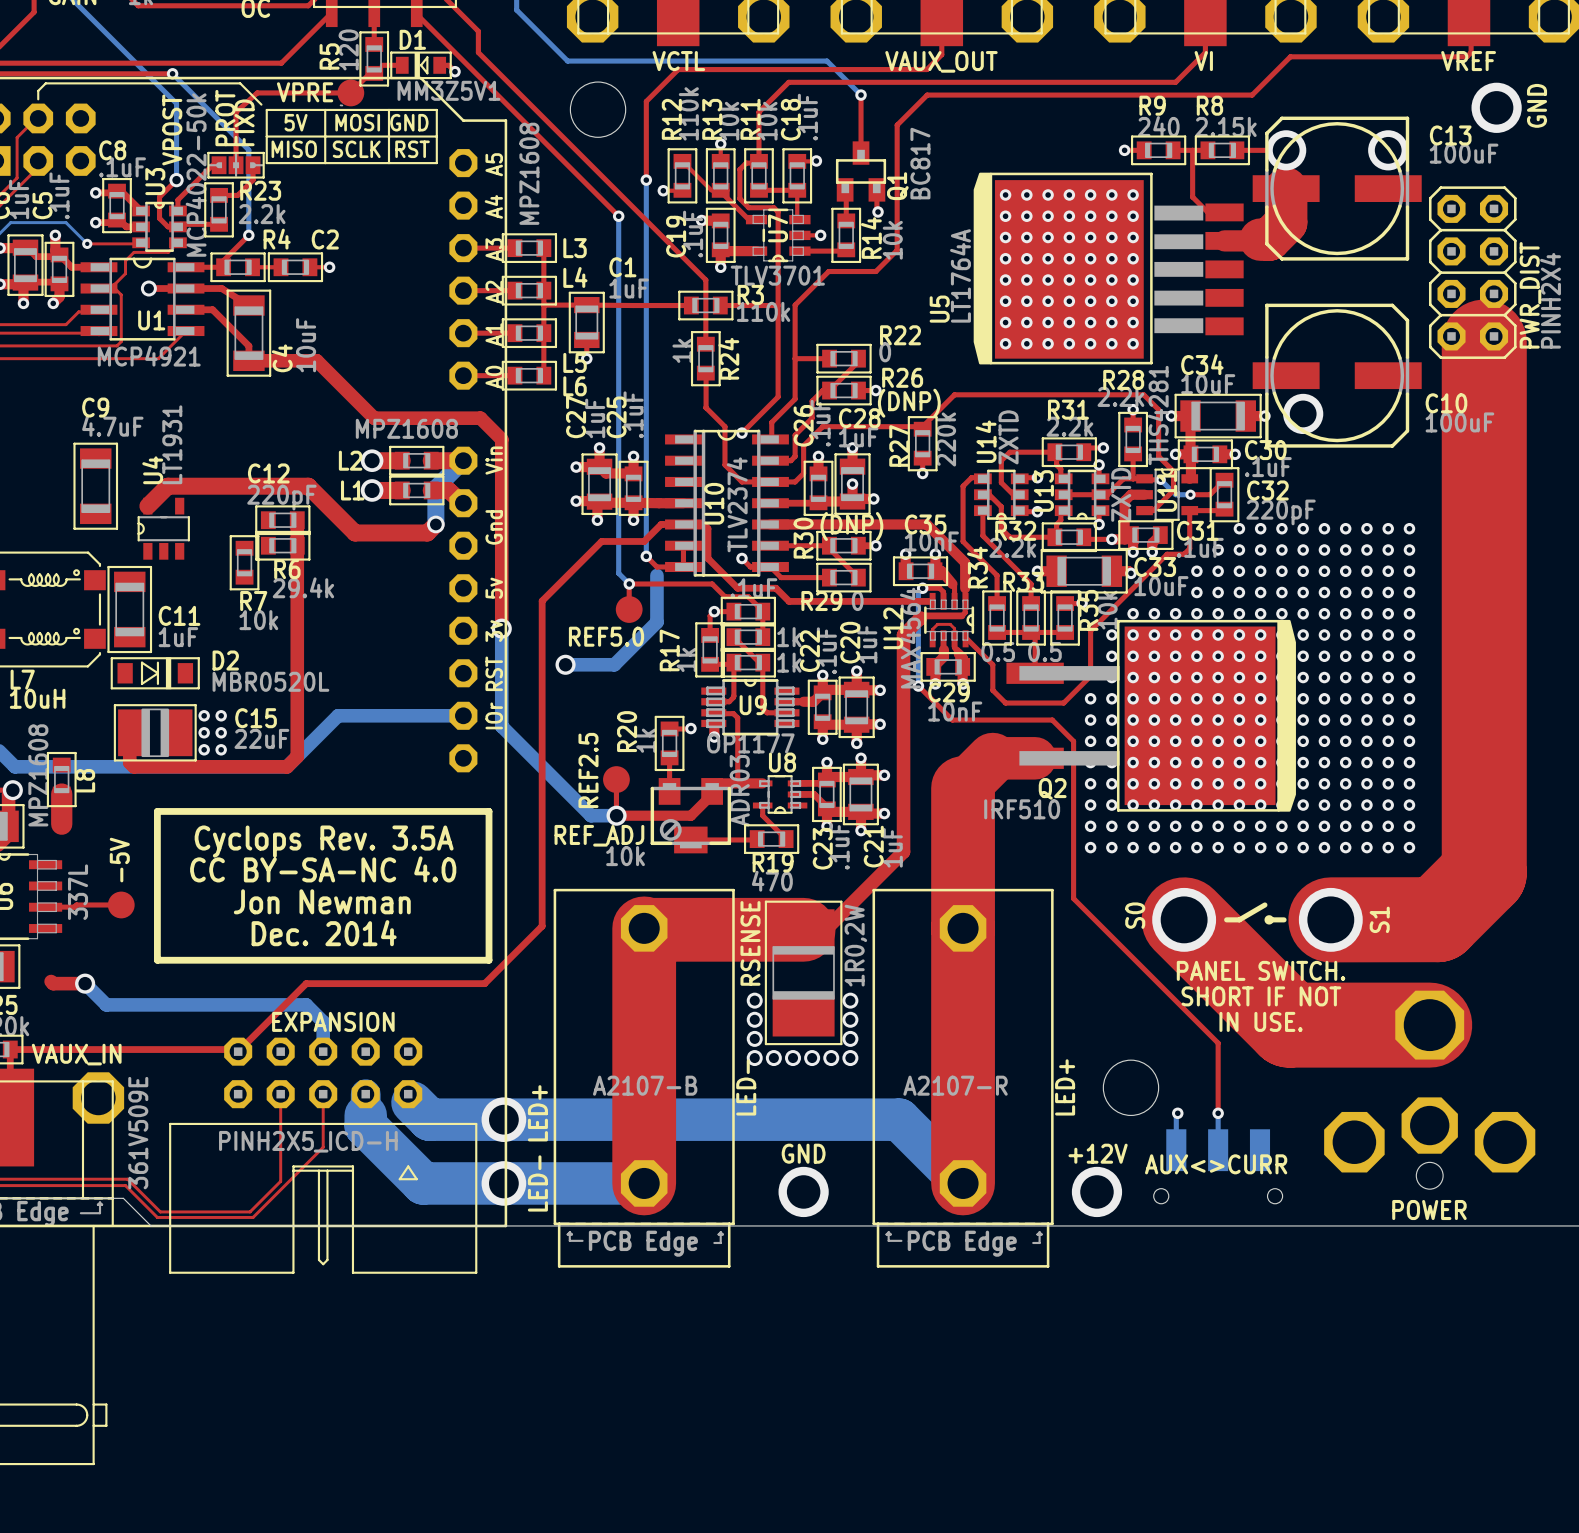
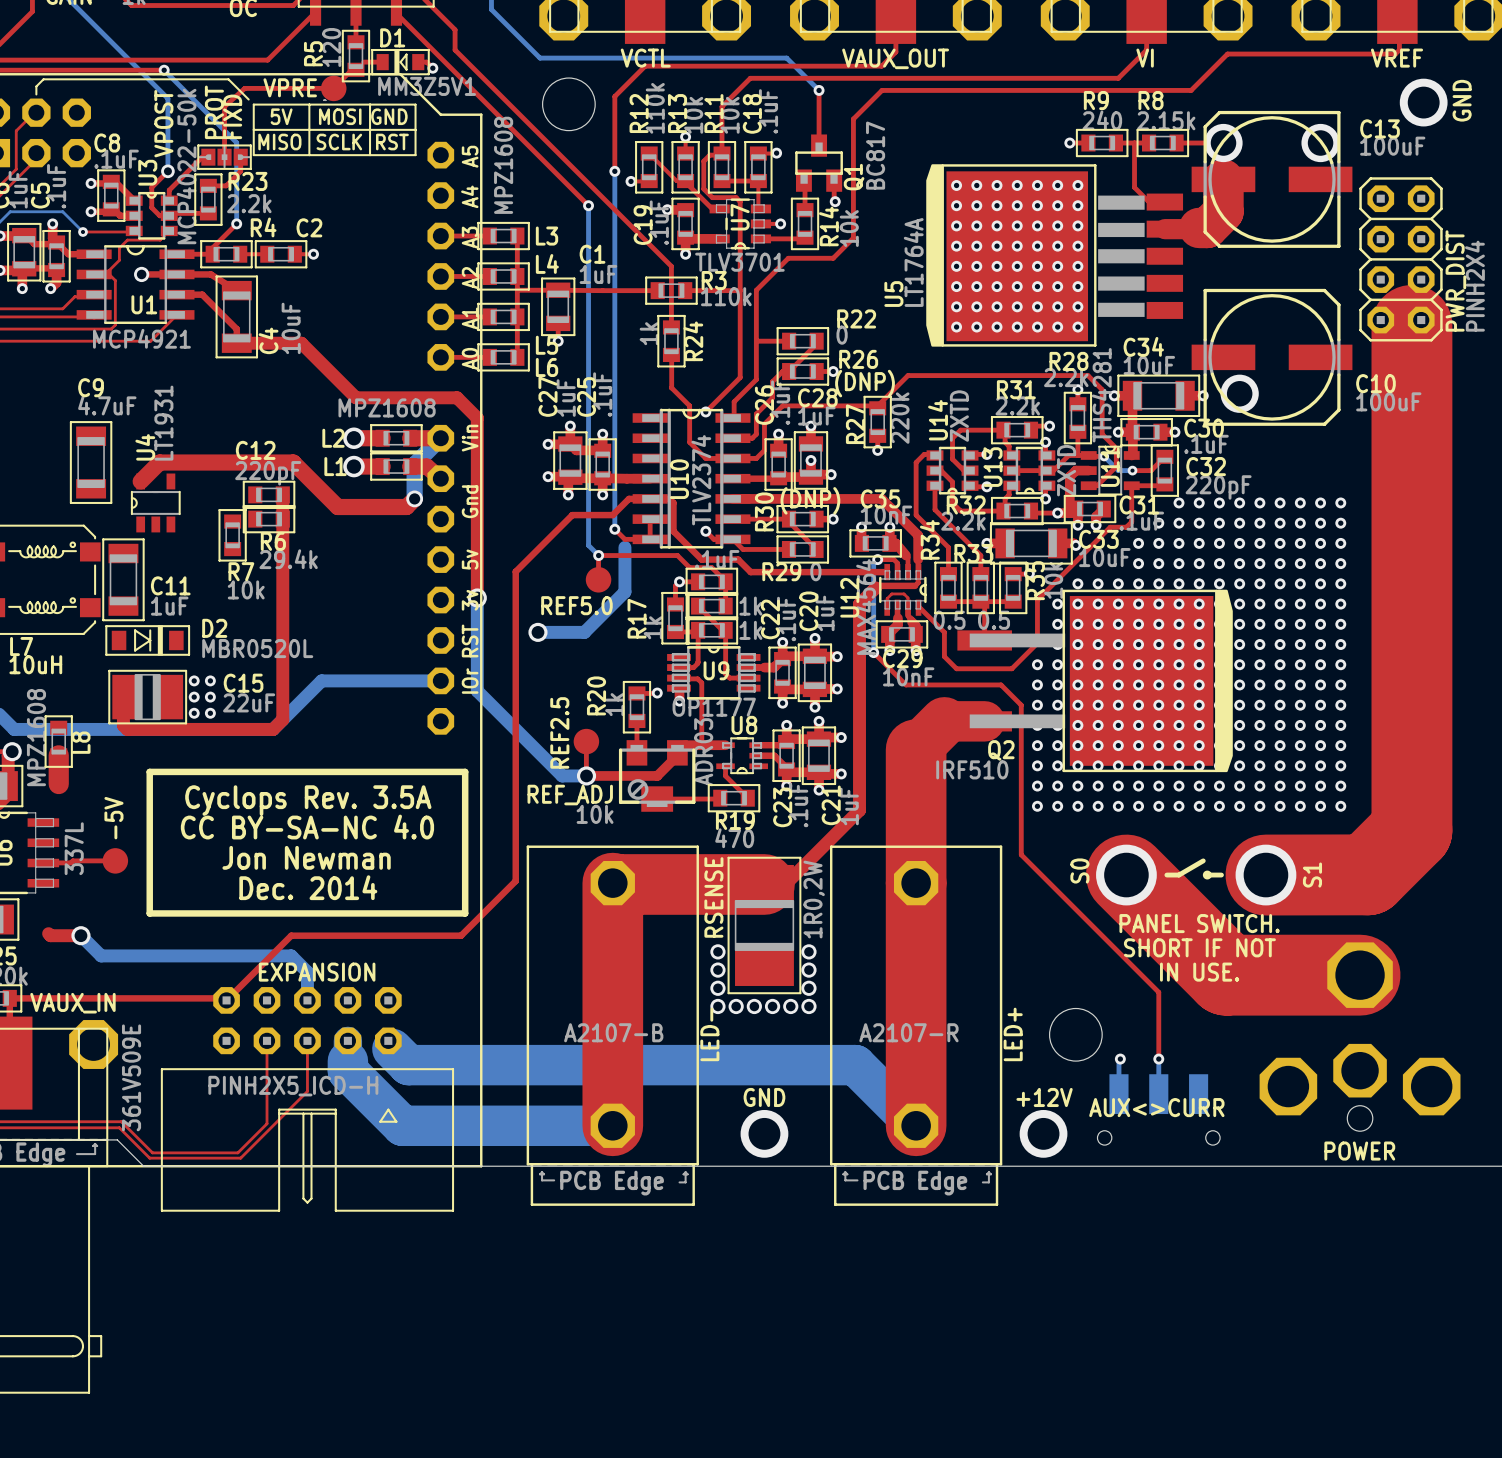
text: LED+ (537, 1113) -> none
via: (503, 1119) -> none
via: (503, 1183) -> none
text: LED- (537, 1183) -> none

